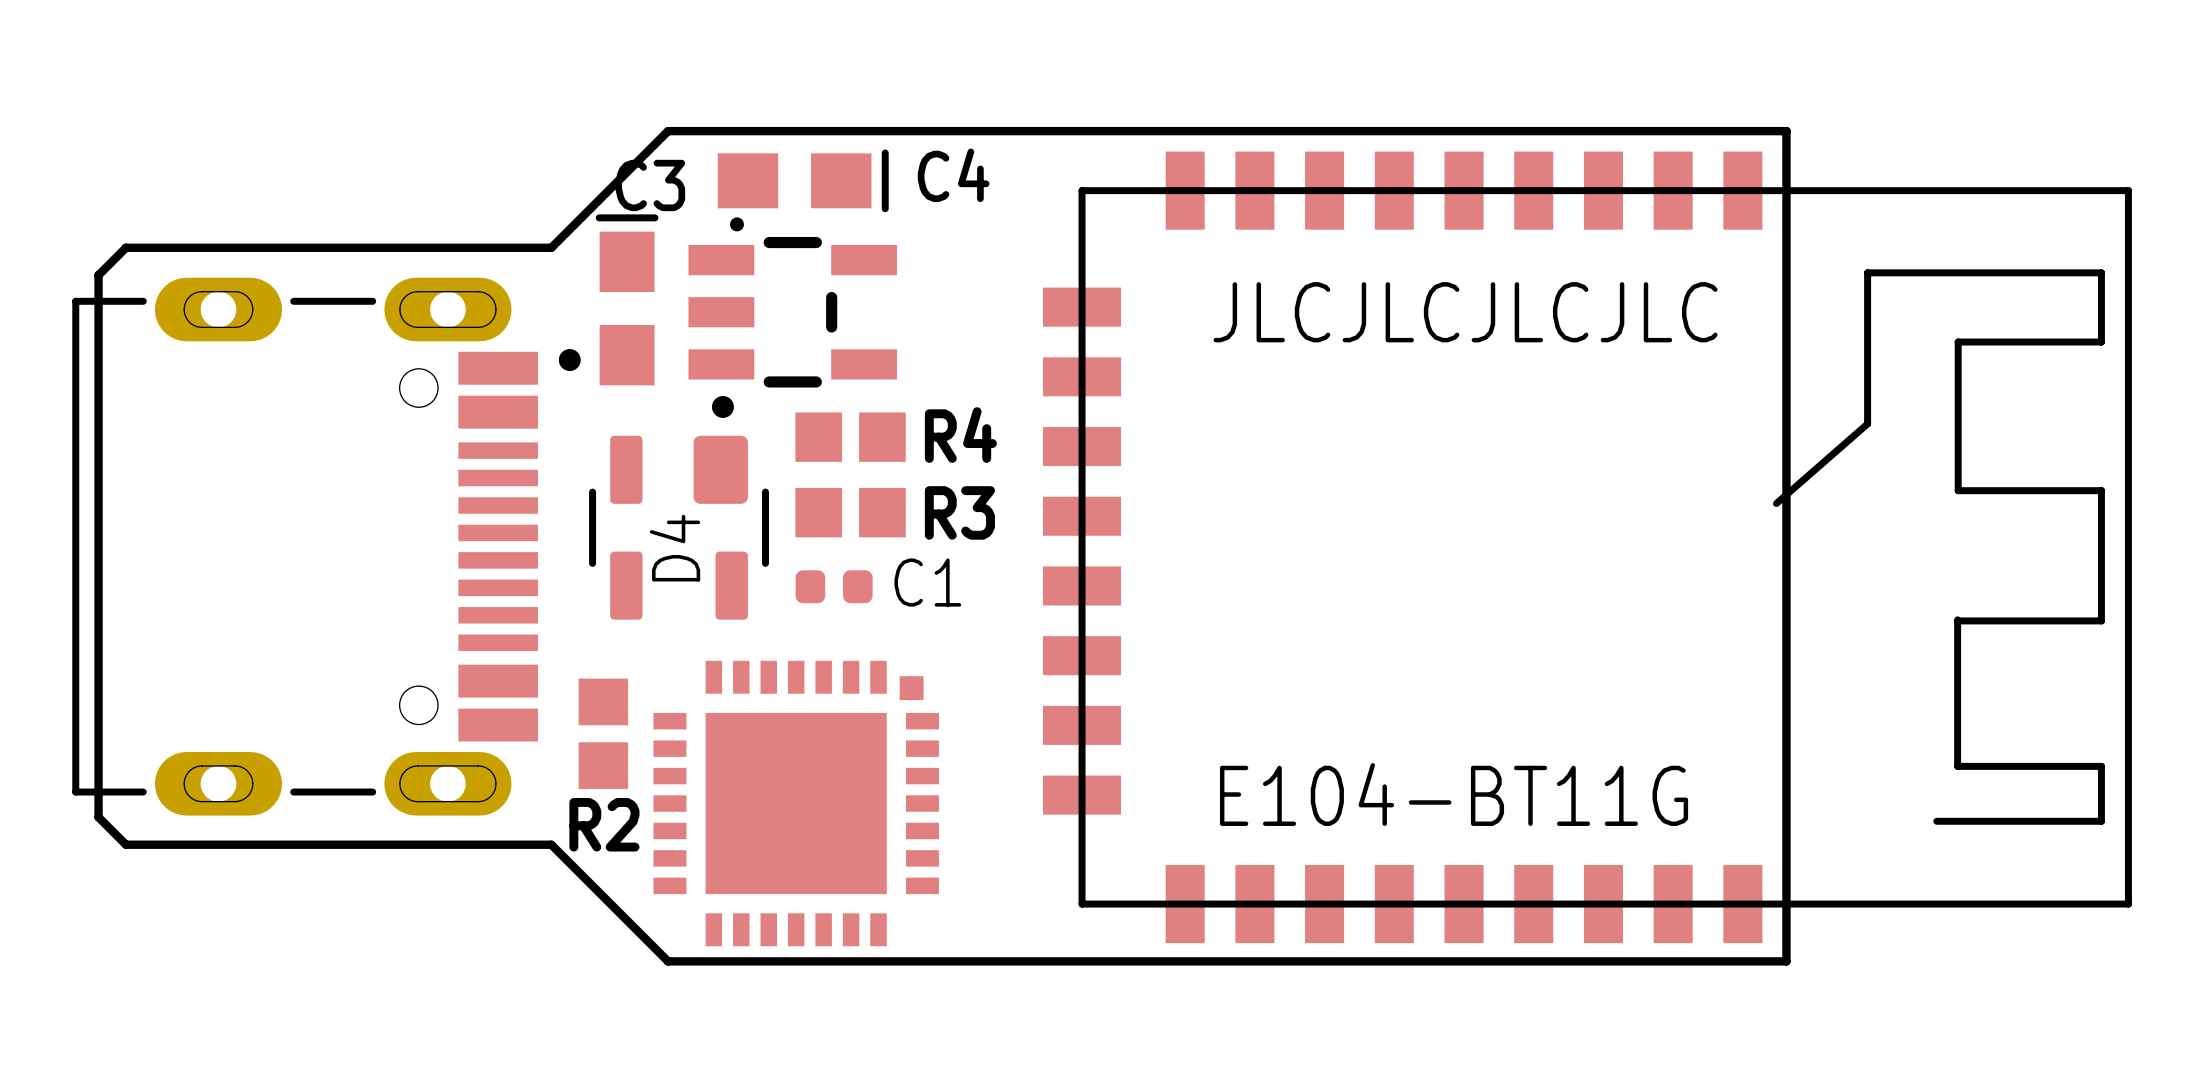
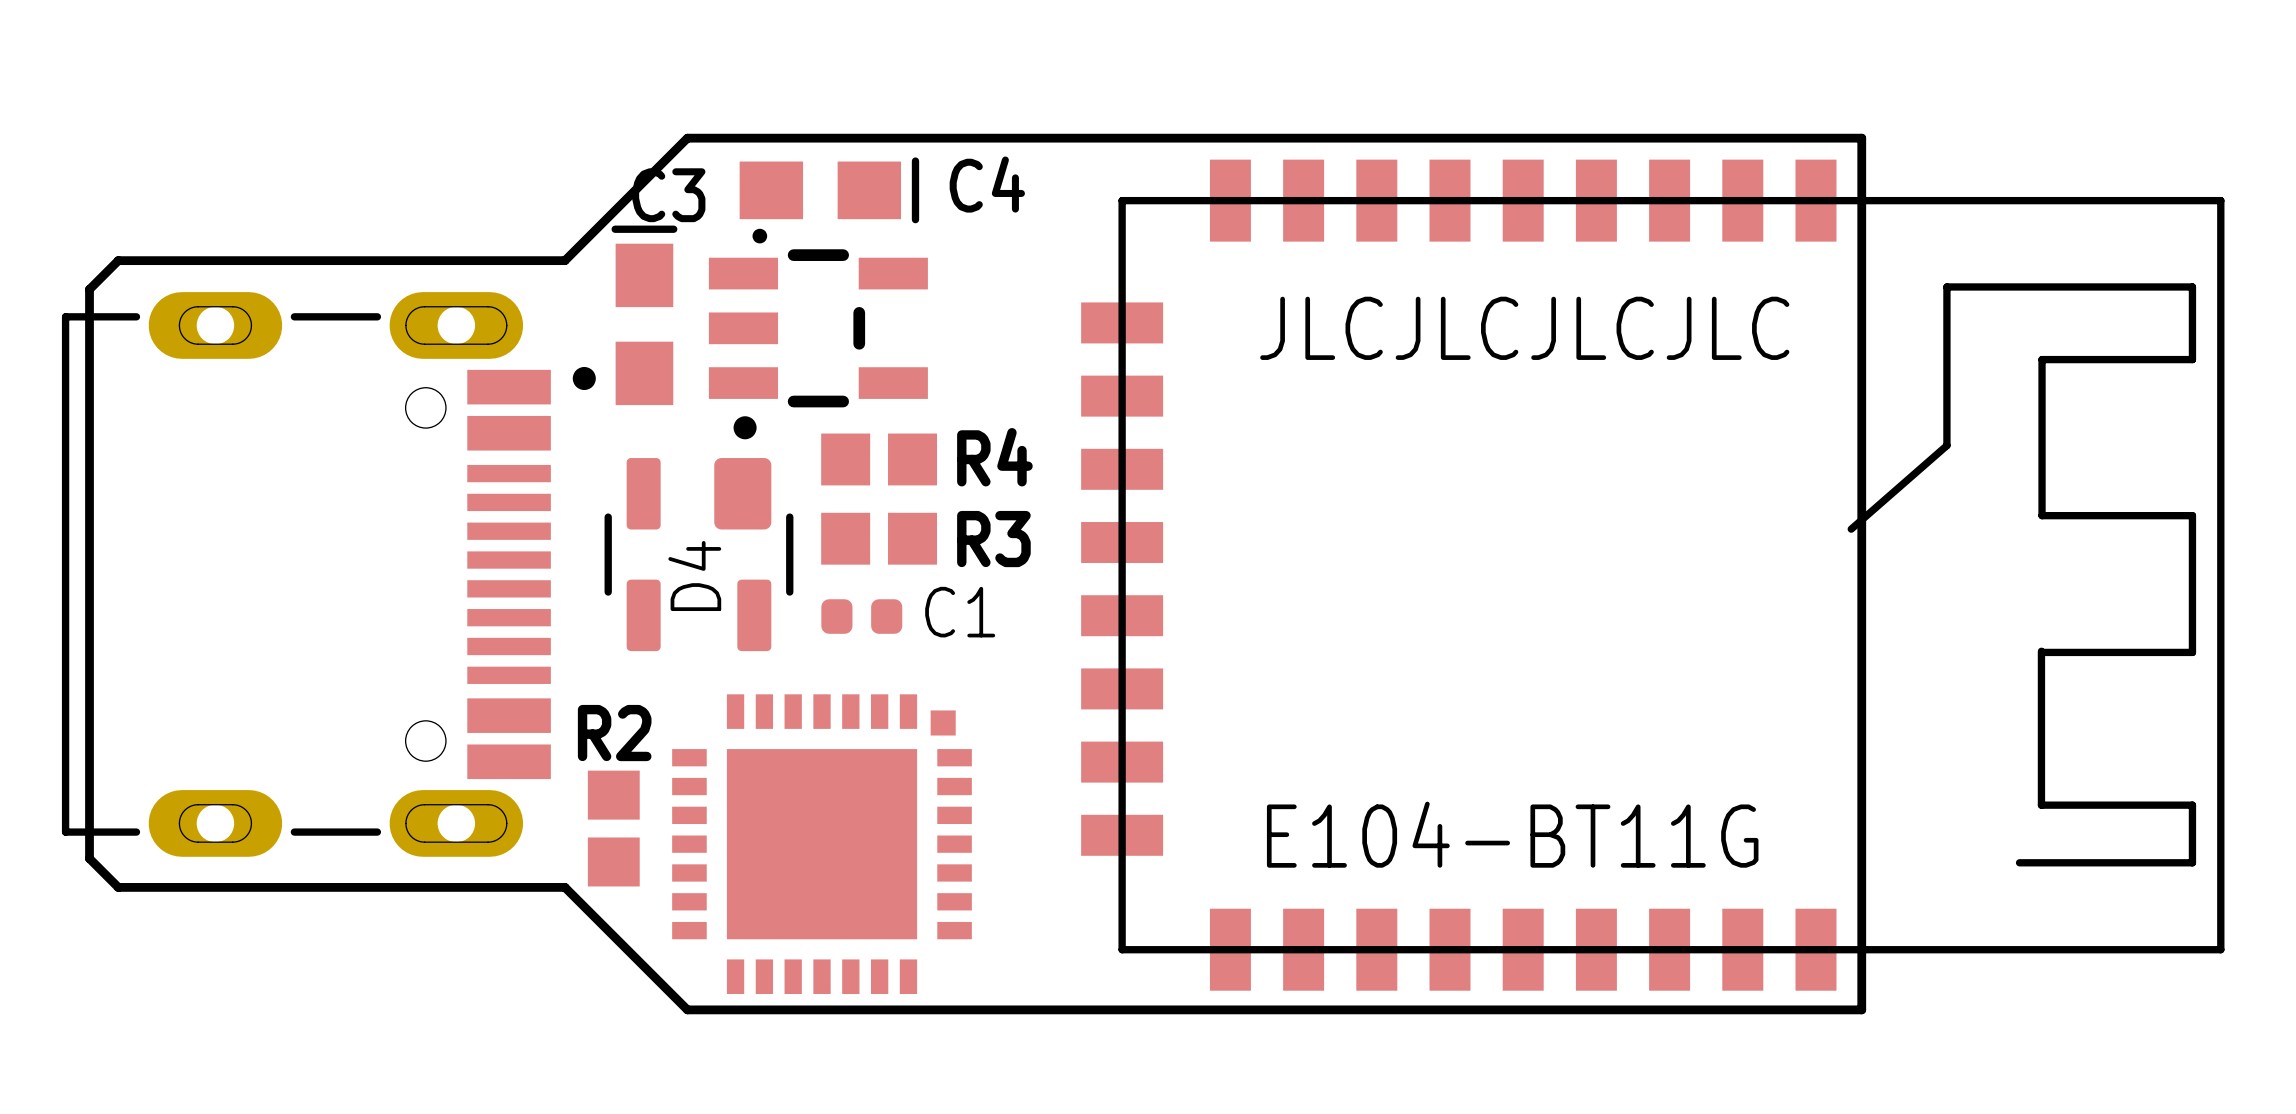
R2 position: (603, 733) -> (613, 828)
R2 name position: R2 (604, 824) -> R2 (614, 733)

